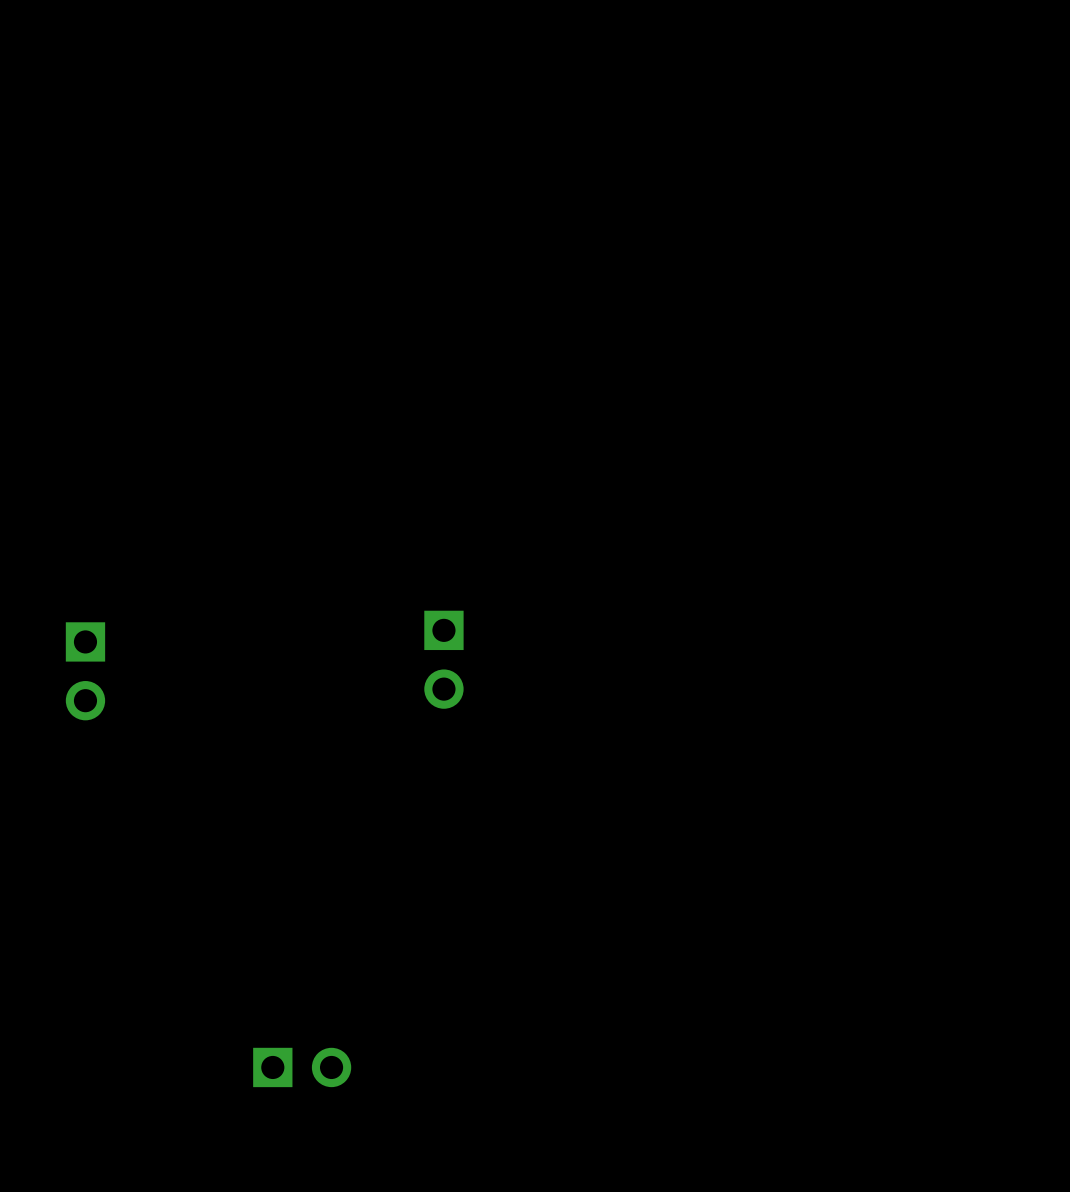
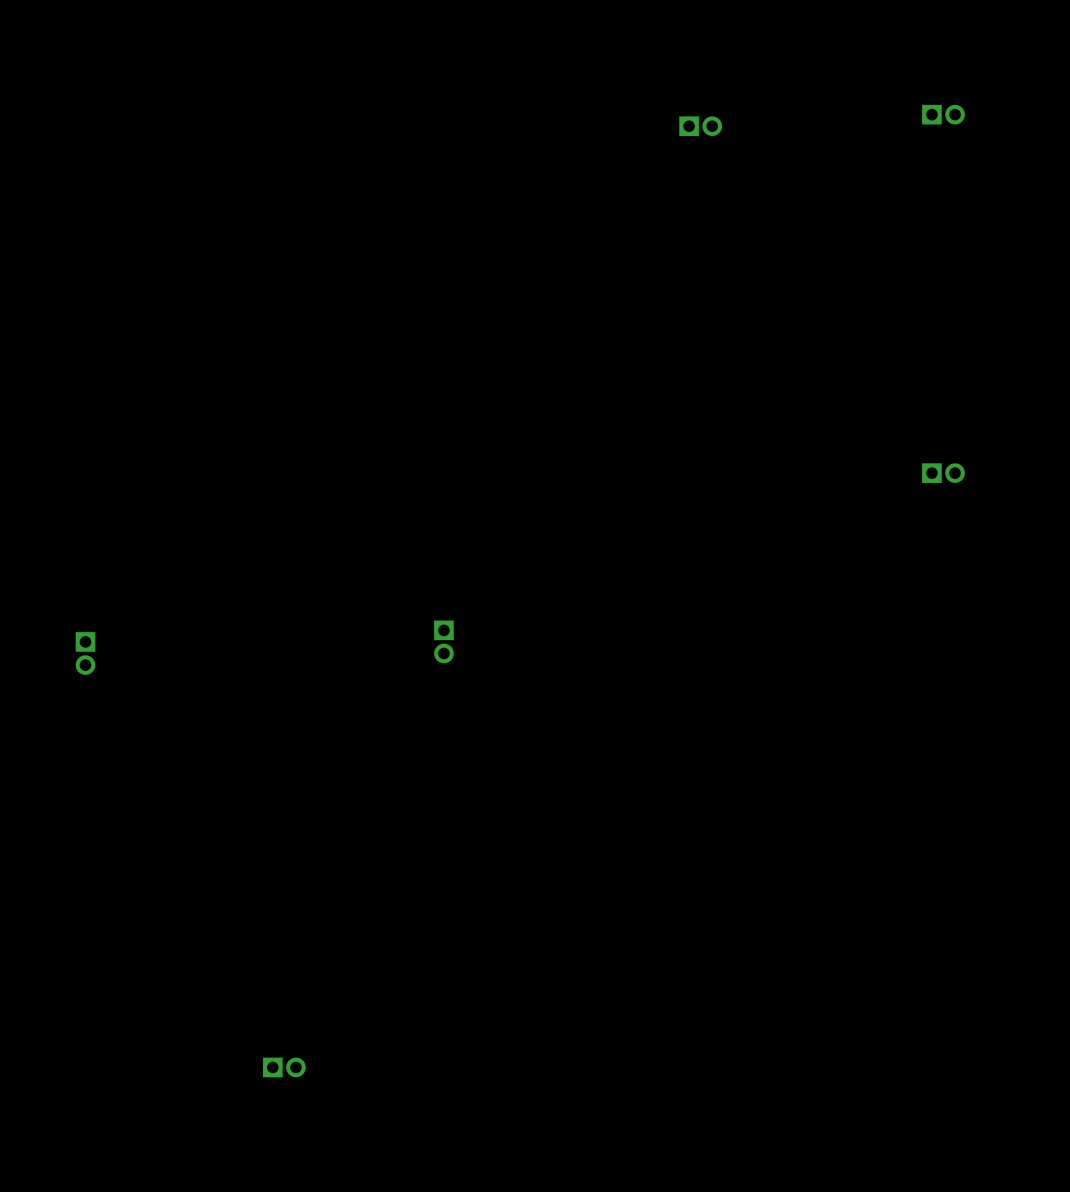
part: none -> (943, 114)
part: none -> (700, 126)
part: none -> (943, 473)
part footprint: [424, 610, 464, 709] -> [434, 620, 454, 664]
part footprint: [65, 622, 106, 721] -> [75, 632, 96, 675]
part footprint: [253, 1047, 352, 1088] -> [262, 1057, 306, 1078]

